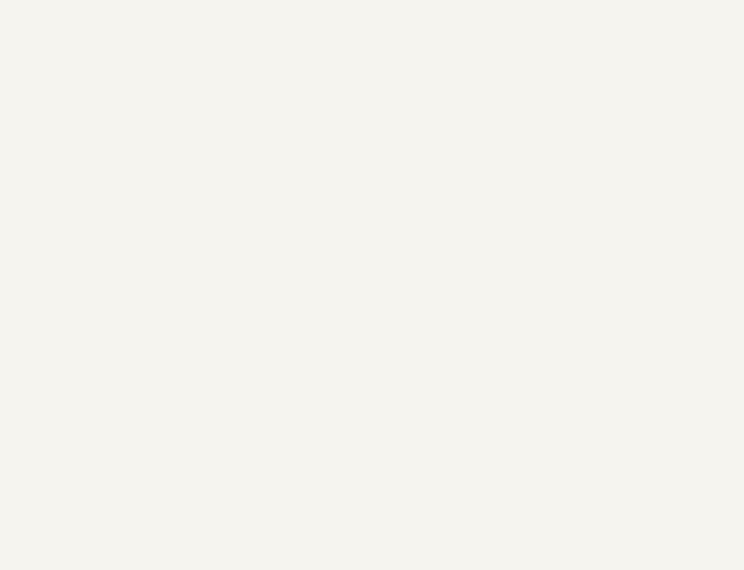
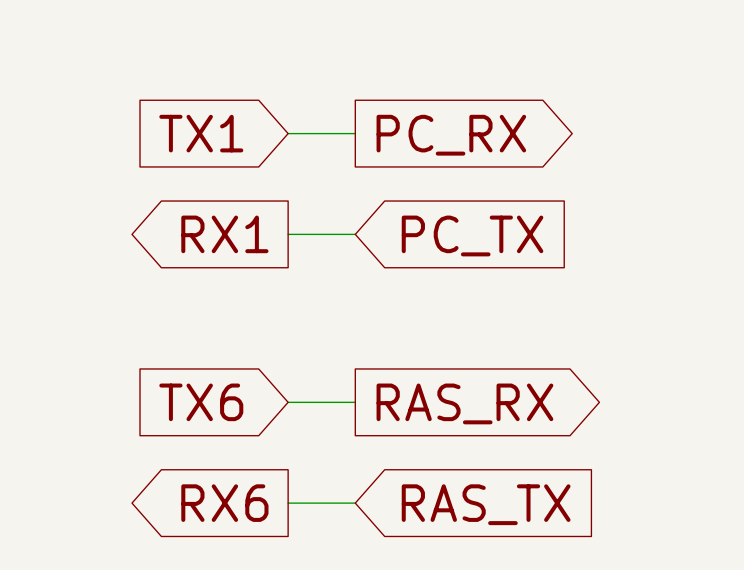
global label: none -> TX1 (201, 133)
wire: none -> (288, 133) (355, 133)
global label: none -> PC_RX (451, 135)
global label: none -> RX1 (224, 234)
wire: none -> (288, 234) (355, 234)
global label: none -> PC_TX (472, 235)
global label: none -> TX6 (201, 402)
wire: none -> (288, 402) (355, 402)
global label: none -> RAS_RX (464, 403)
global label: none -> RX6 (224, 503)
wire: none -> (288, 503) (355, 503)
global label: none -> RAS_TX (486, 504)

